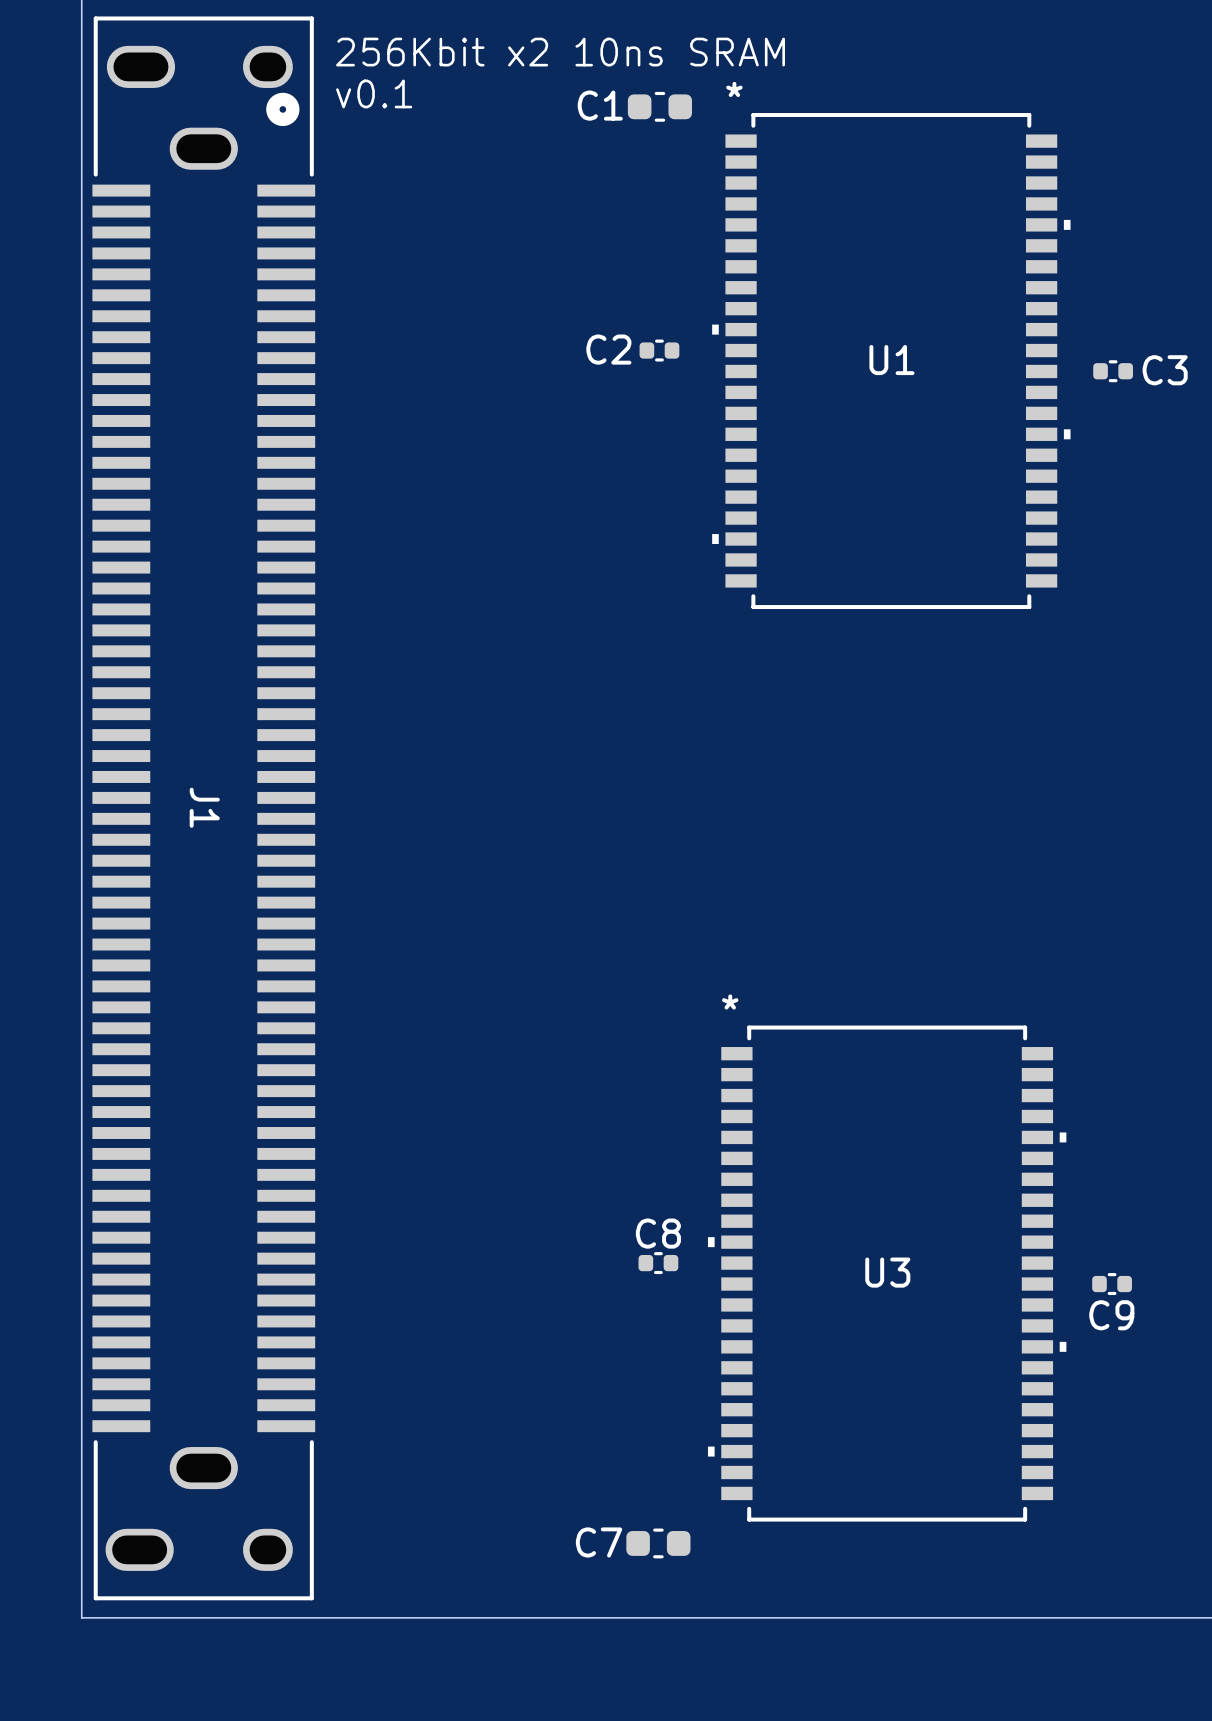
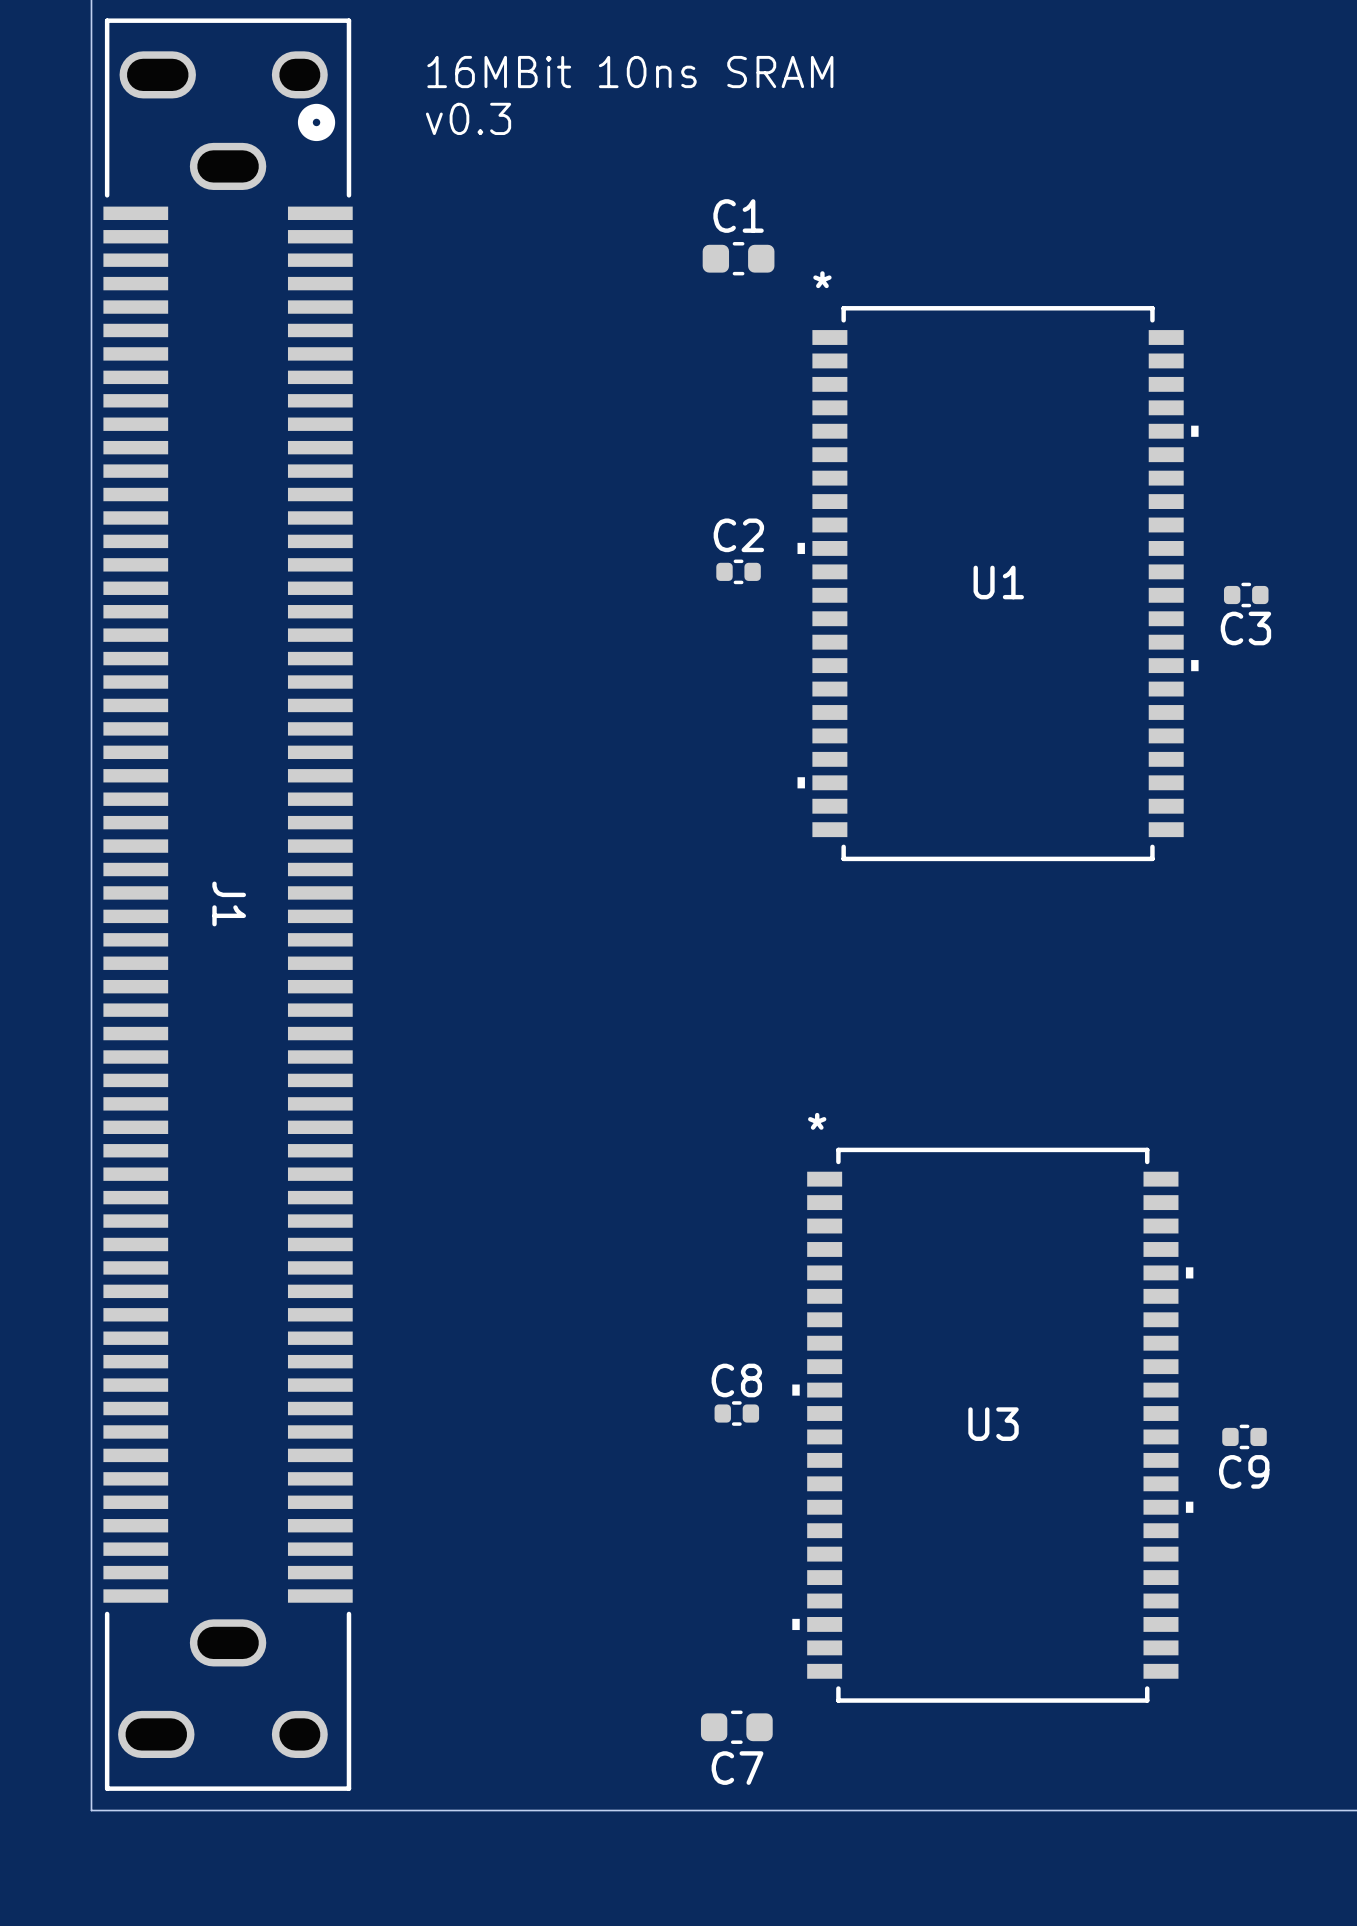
text: 256Kbit x2 10ns SRAM (560, 52) -> 16MBit 10ns SRAM (630, 72)
text: v0.1 (374, 93) -> v0.3 (468, 118)
C1 name position: C1 (600, 105) -> C1 (738, 216)
C1 position: (659, 106) -> (738, 258)
C2 name position: C2 (608, 349) -> C2 (738, 535)
C2 position: (659, 350) -> (738, 571)
U1 position: (891, 361) -> (998, 583)
C3 name position: C3 (1165, 370) -> C3 (1245, 628)
C3 position: (1113, 371) -> (1246, 595)
C7 name position: C7 (599, 1542) -> C7 (737, 1768)

